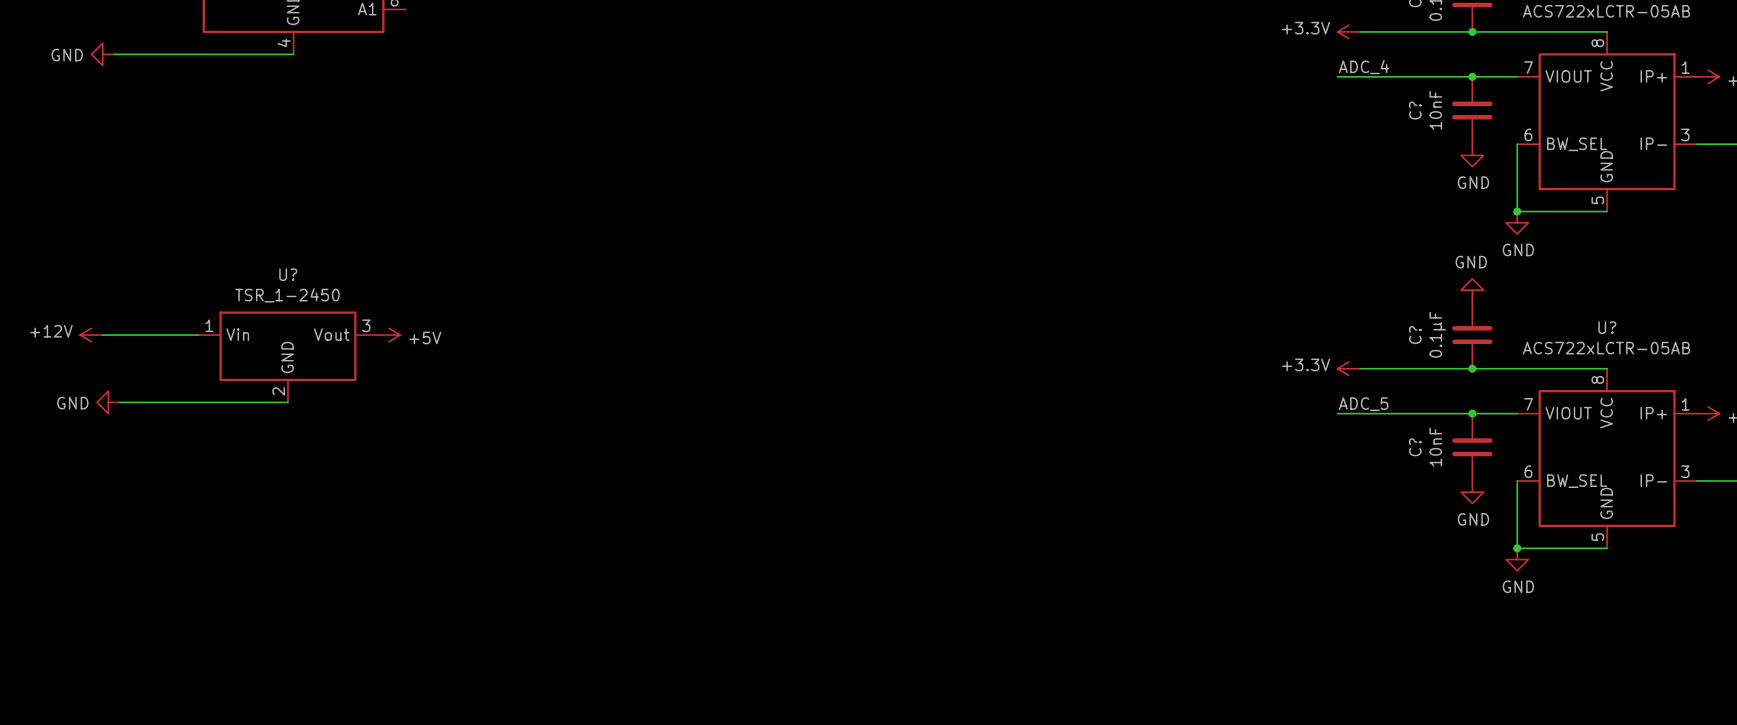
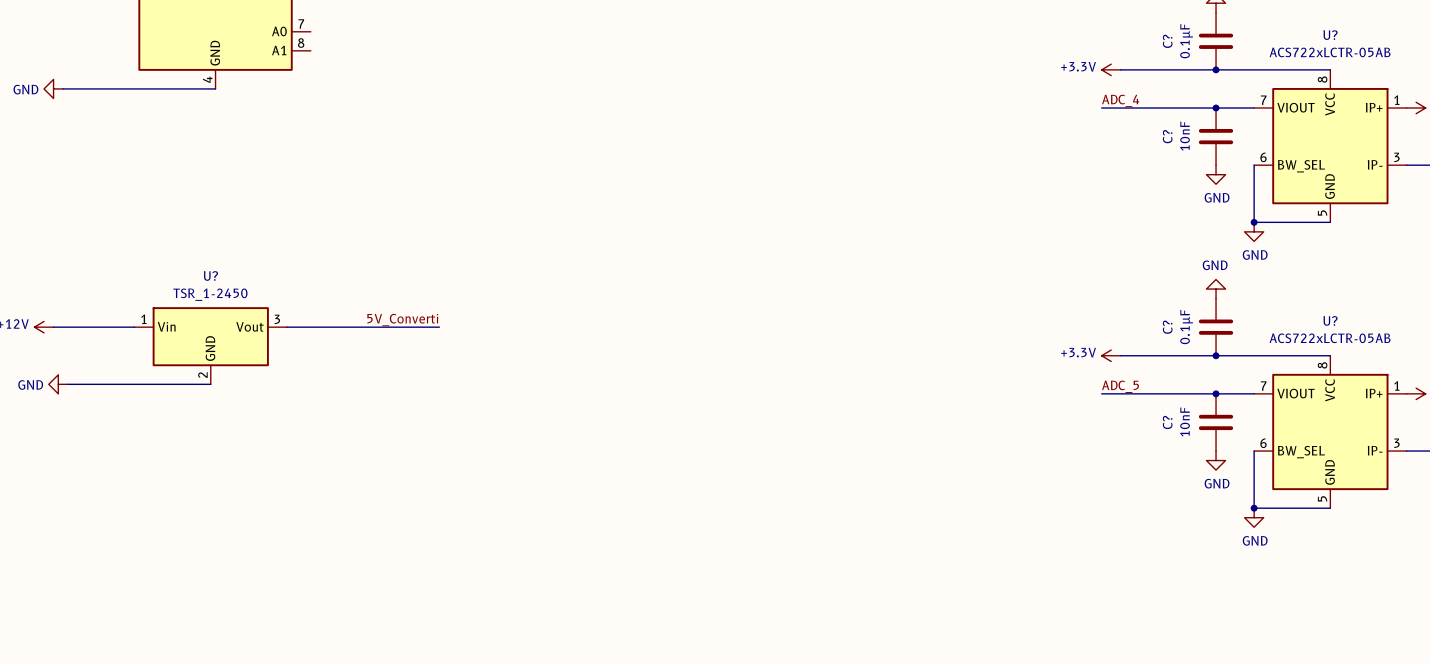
label: none -> 5V_Converti (402, 320)
wire: none -> (287, 327) (439, 327)
power symbol: +5V (389, 335) -> none

